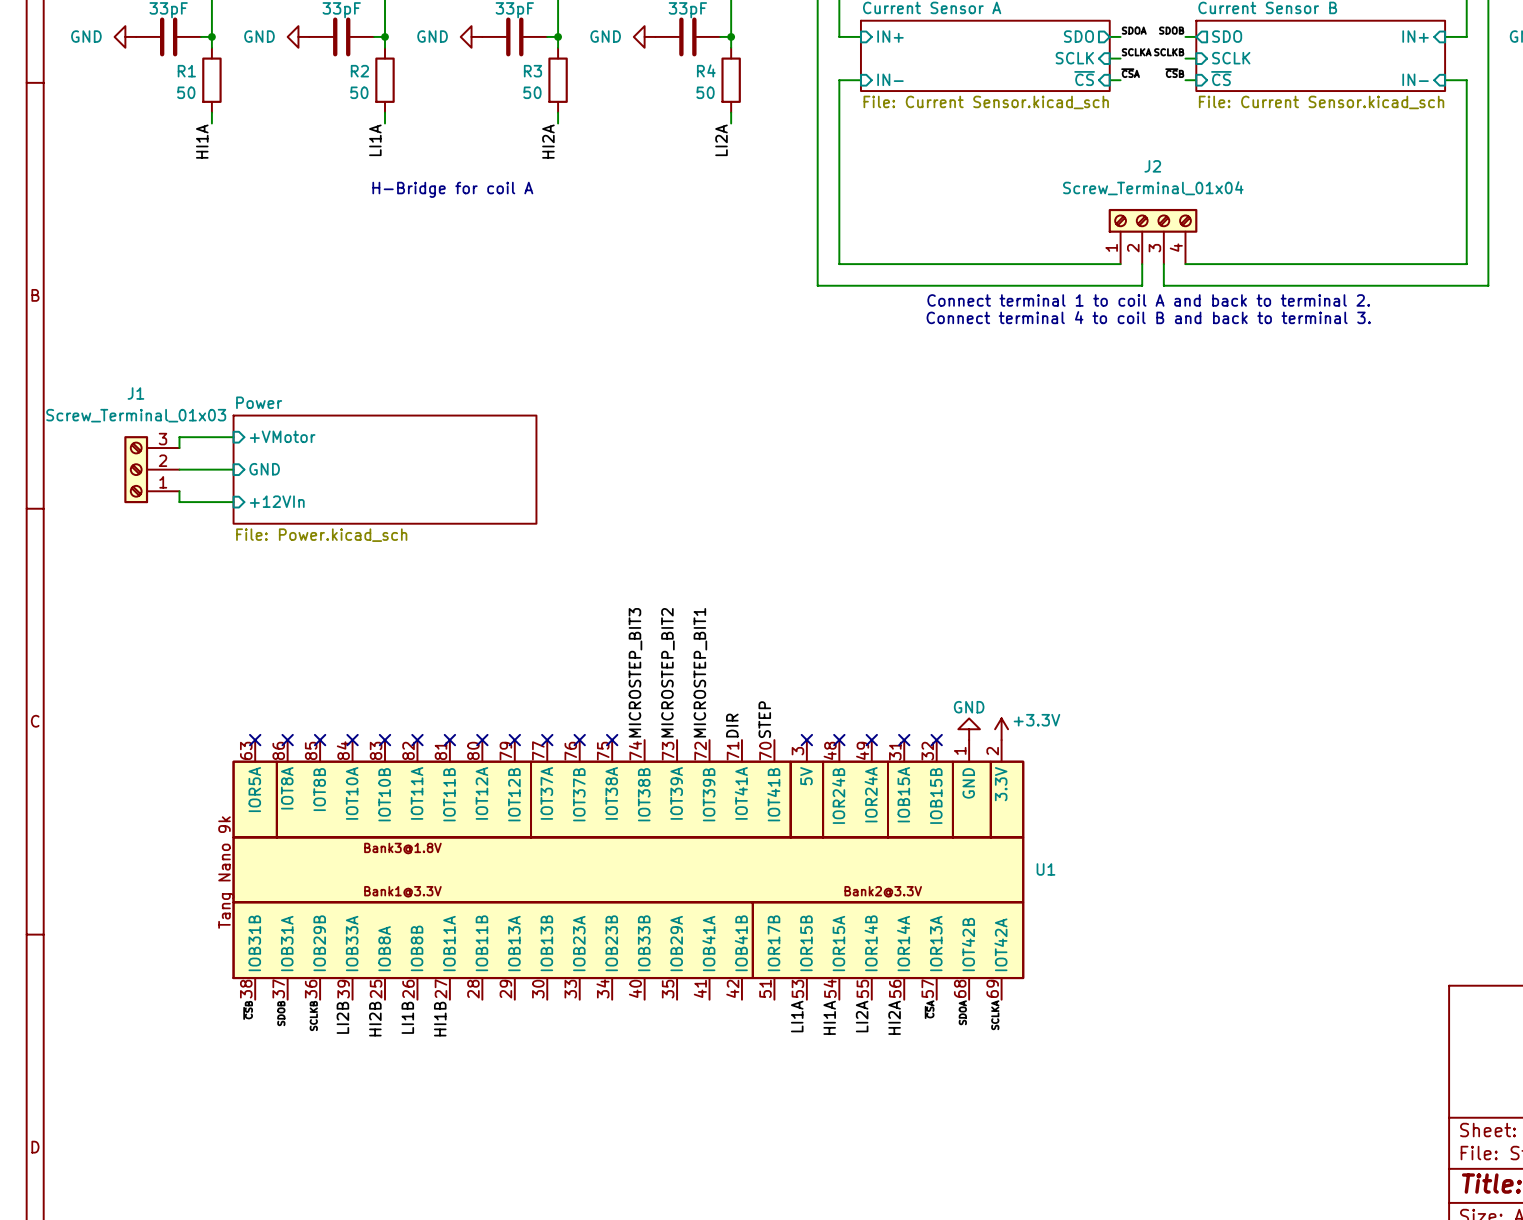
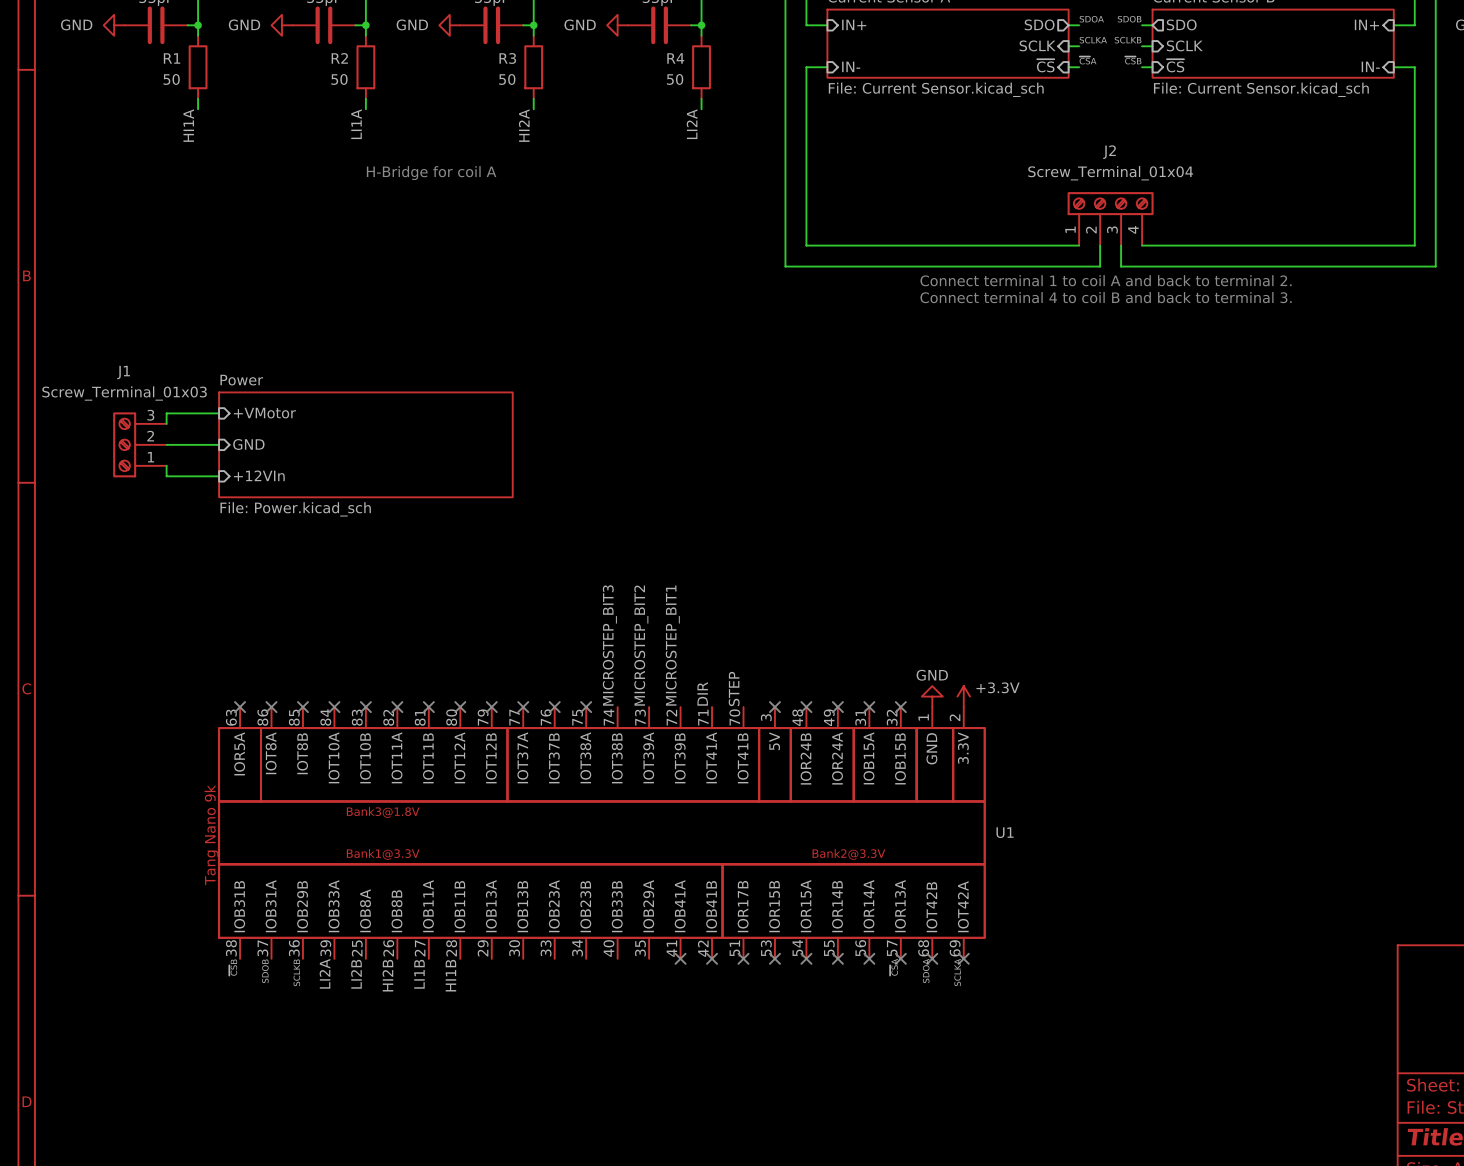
no-connect mark: none -> (680, 958)
no-connect mark: none -> (712, 958)
no-connect mark: none -> (743, 958)
no-connect mark: none -> (774, 958)
no-connect mark: none -> (806, 958)
no-connect mark: none -> (837, 958)
no-connect mark: none -> (869, 958)
no-connect mark: none -> (900, 958)
no-connect mark: none -> (932, 958)
no-connect mark: none -> (963, 958)
label: LI1A (797, 1016) -> none
label: LI2A (862, 1016) -> none
label: LI2B (342, 1017) -> LI2A (324, 973)
label: LI1B (407, 1017) -> HI2B (387, 975)
label: HI1A (829, 1017) -> none
label: HI2A (894, 1017) -> none
label: HI2B (375, 1019) -> LI2B (356, 974)
label: HI1B (440, 1019) -> LI1B (419, 974)
label: none -> HI1B (450, 975)

